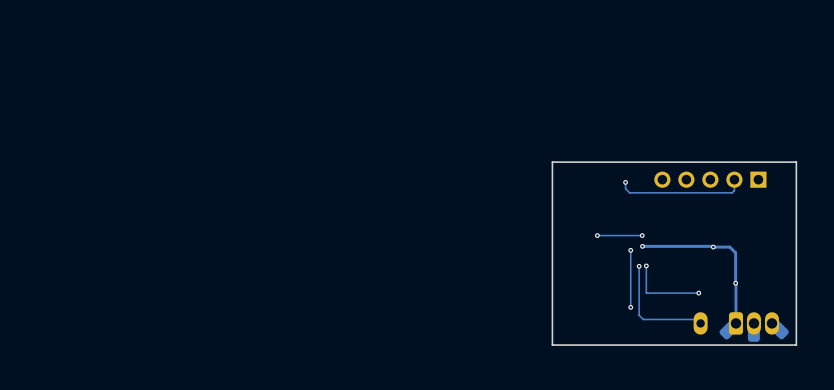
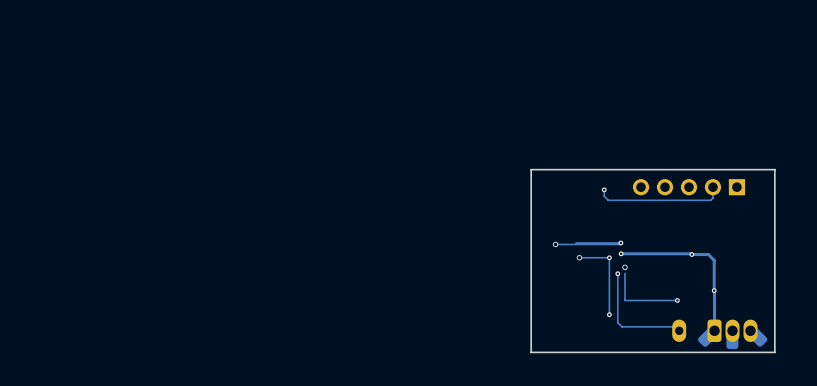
via: (597, 235) -> none
track: none -> (618, 243) (620, 244) (555, 244)
via: none -> (555, 244)
via: none -> (579, 257)
track: none -> (609, 257) (579, 257)
via: none -> (624, 267)
via: (646, 265) -> none

